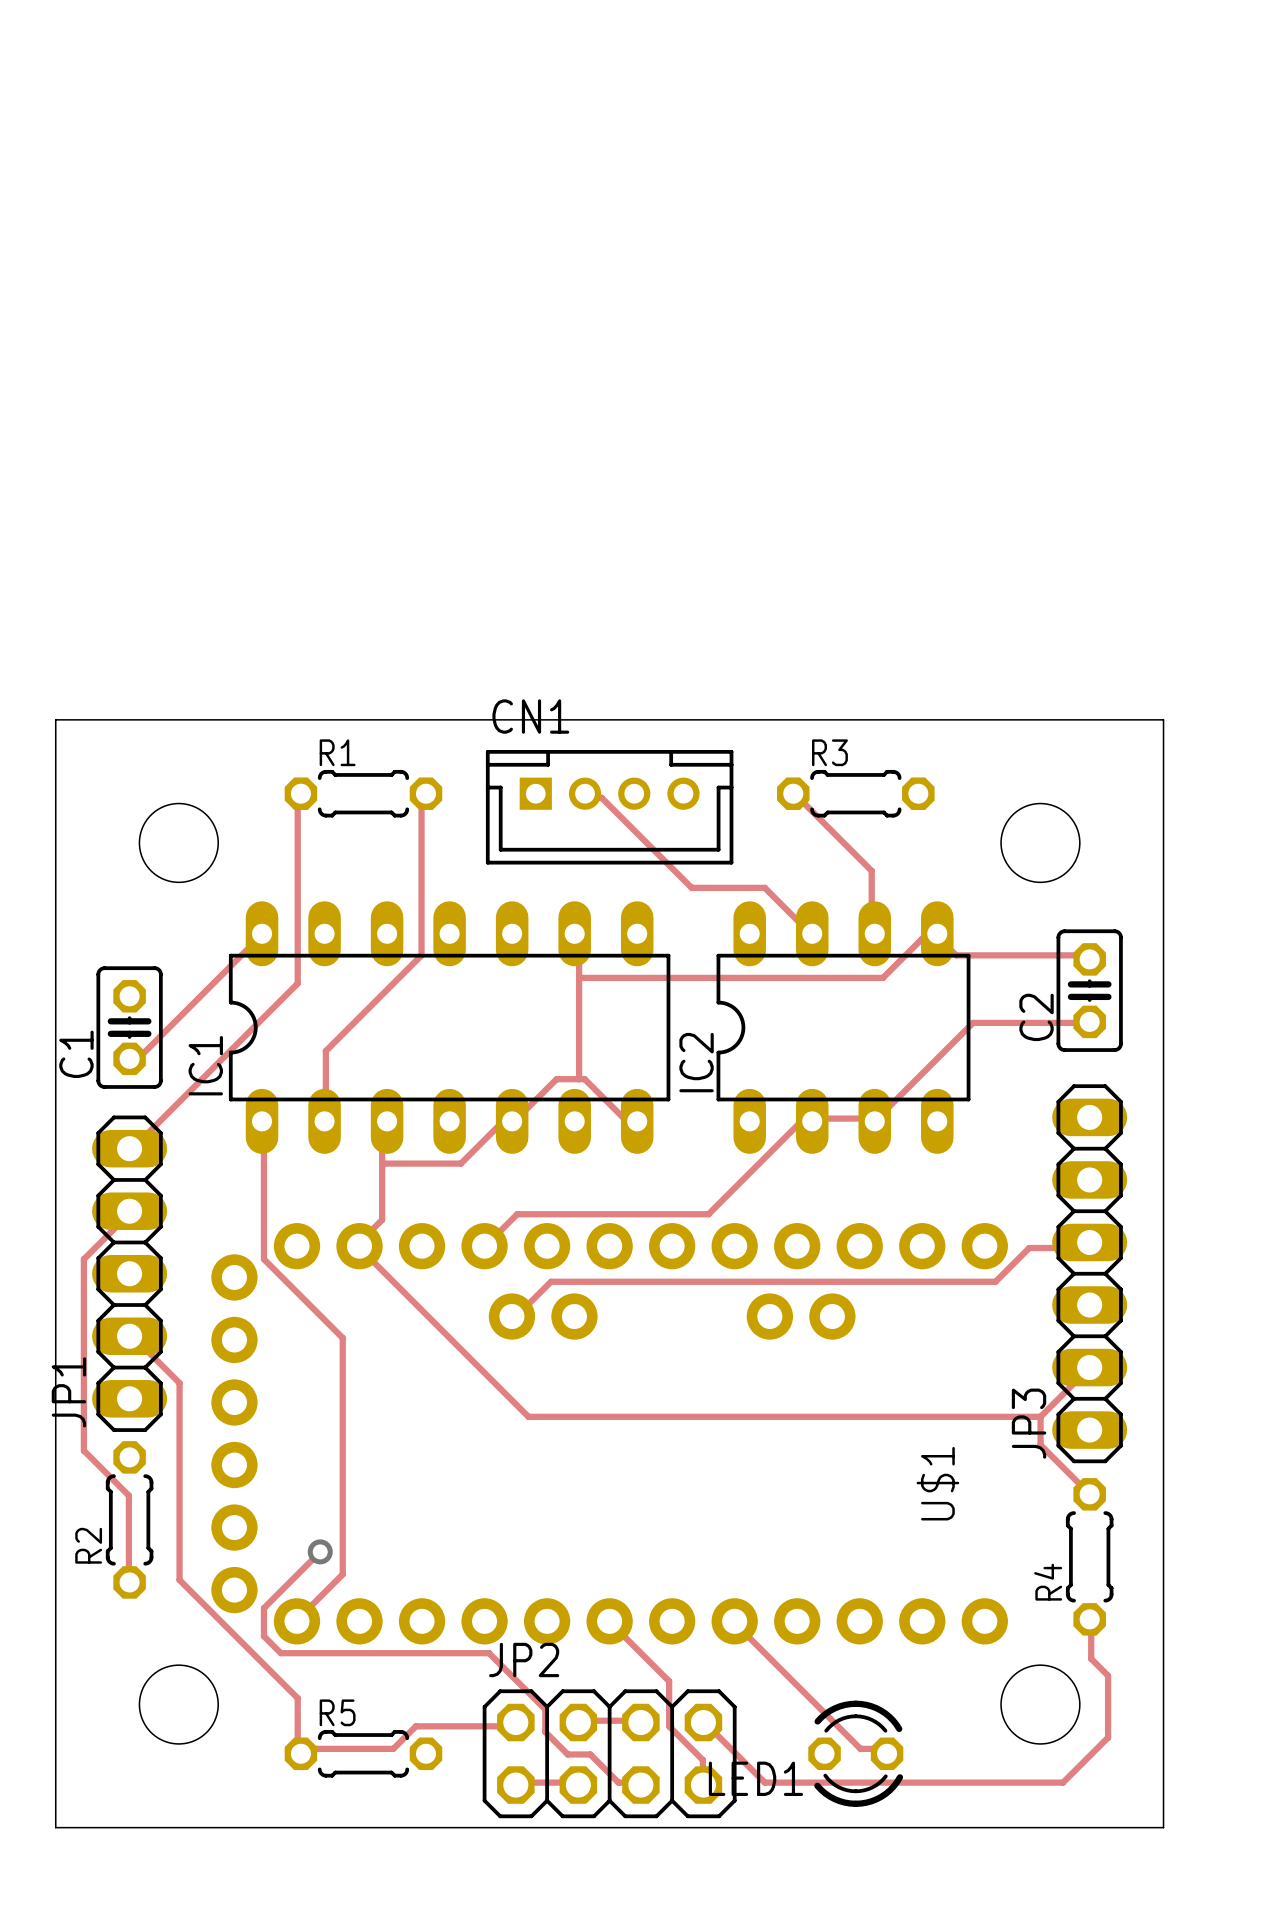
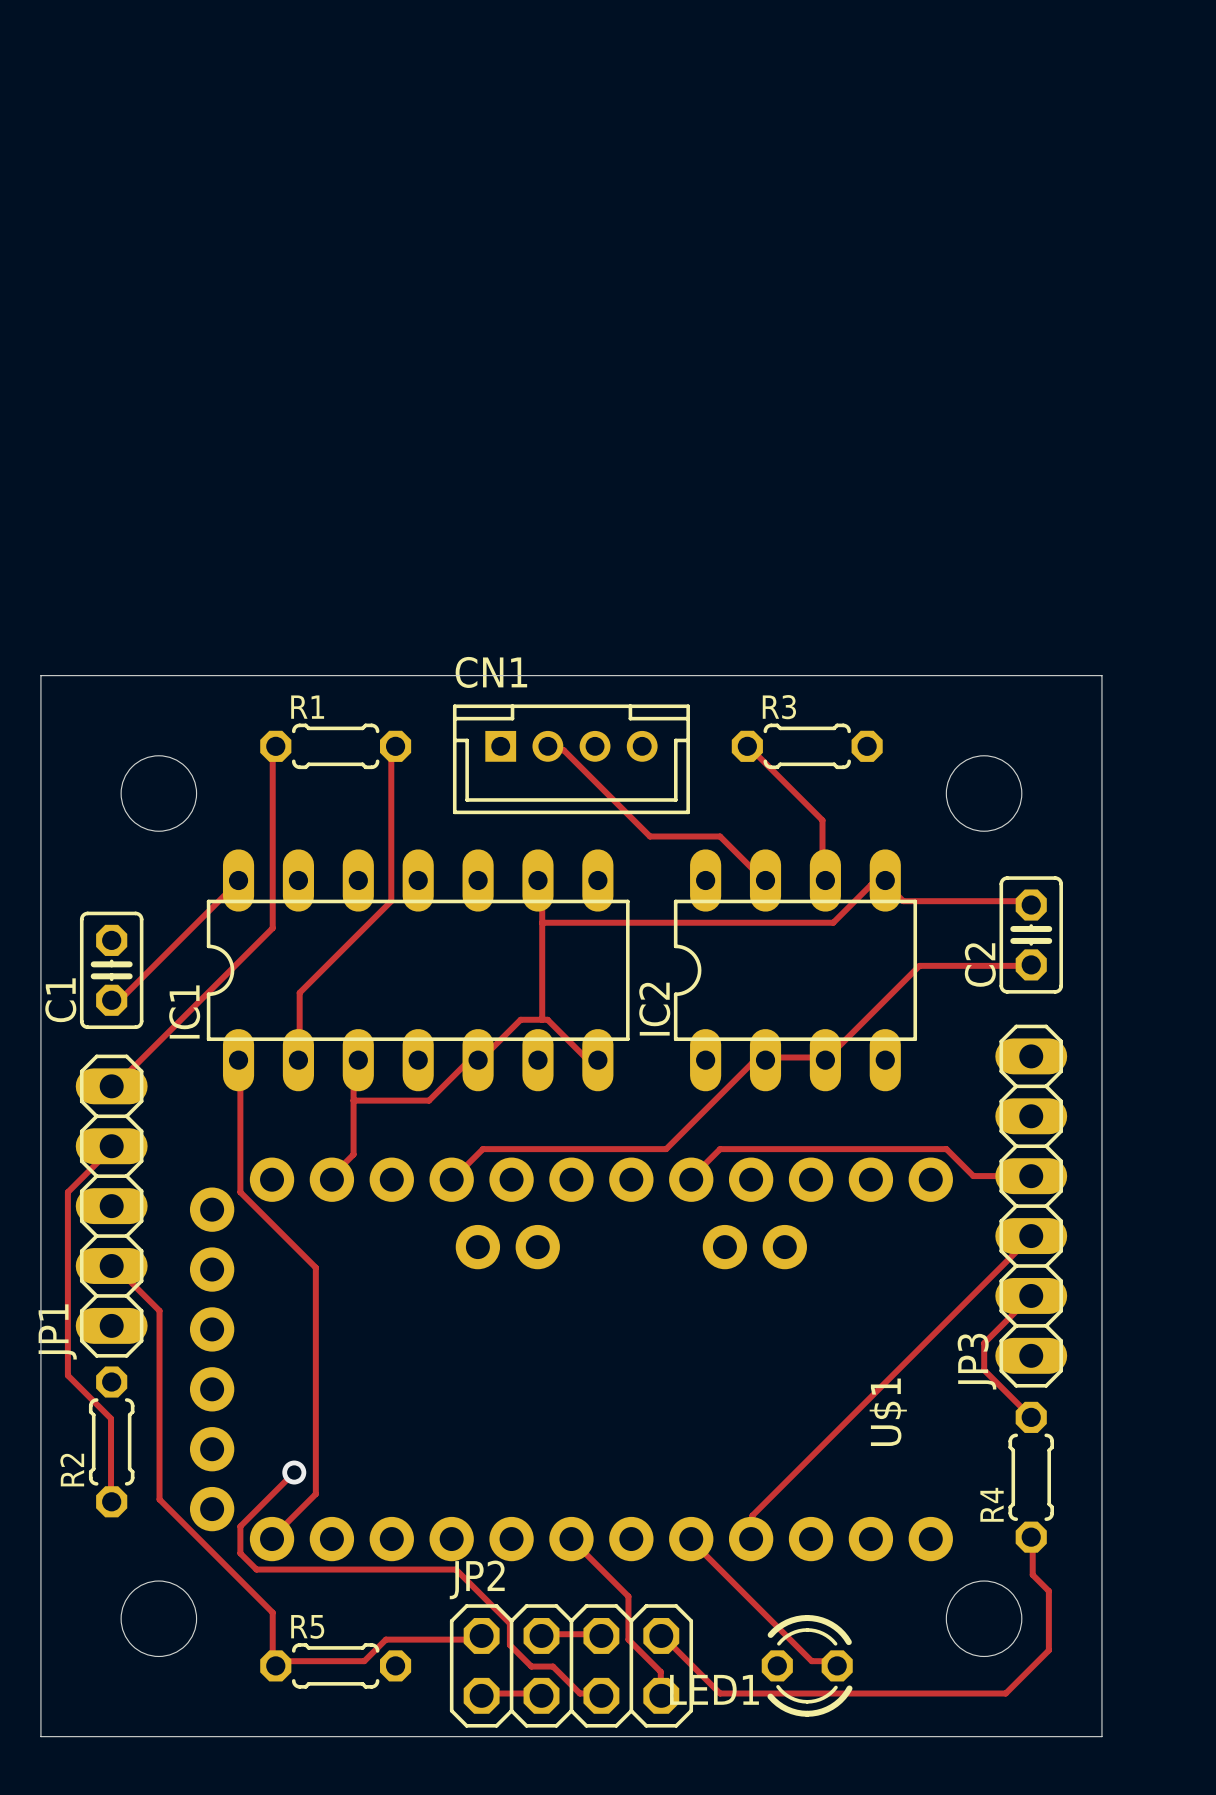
track: (1089, 1242) (1085, 1248) (1029, 1248) (995, 1281) (550, 1281) (517, 1315) (511, 1316) -> (1031, 1176) (973, 1176) (946, 1149) (720, 1149) (691, 1179)
track: (359, 1246) (528, 1416) (1040, 1416) -> none
track: none -> (1031, 1236) (752, 1515) (751, 1539)

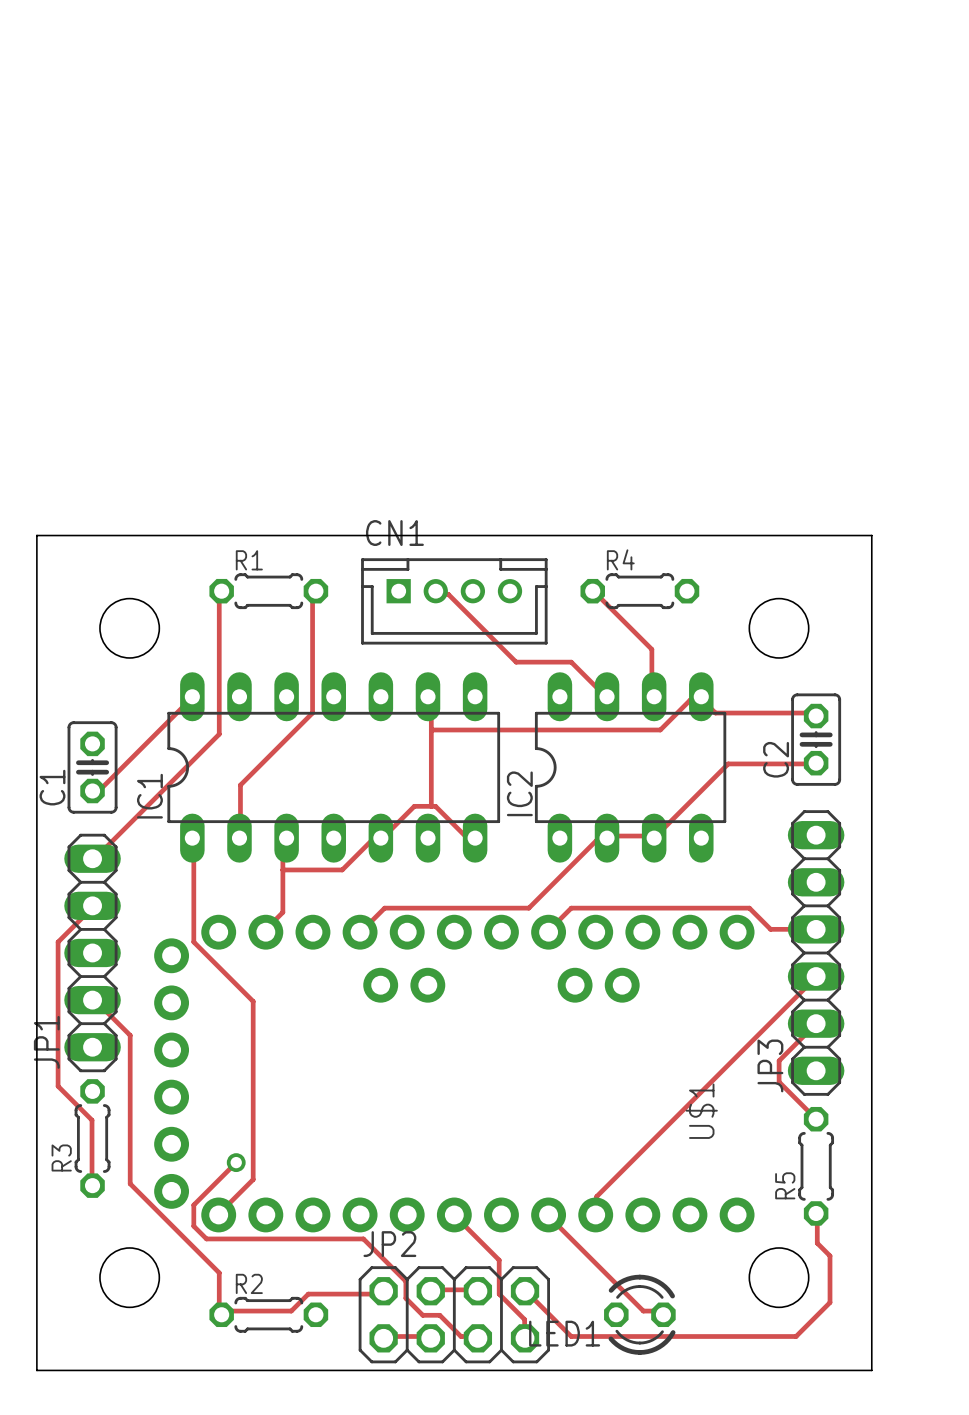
R3 name: R3 (779, 707) -> R4 (620, 559)
R2 name: R2 (72, 1470) -> R3 (61, 1157)
R4 name: R4 (992, 1504) -> R5 (785, 1185)
R5 name: R5 (307, 1626) -> R2 (249, 1283)

